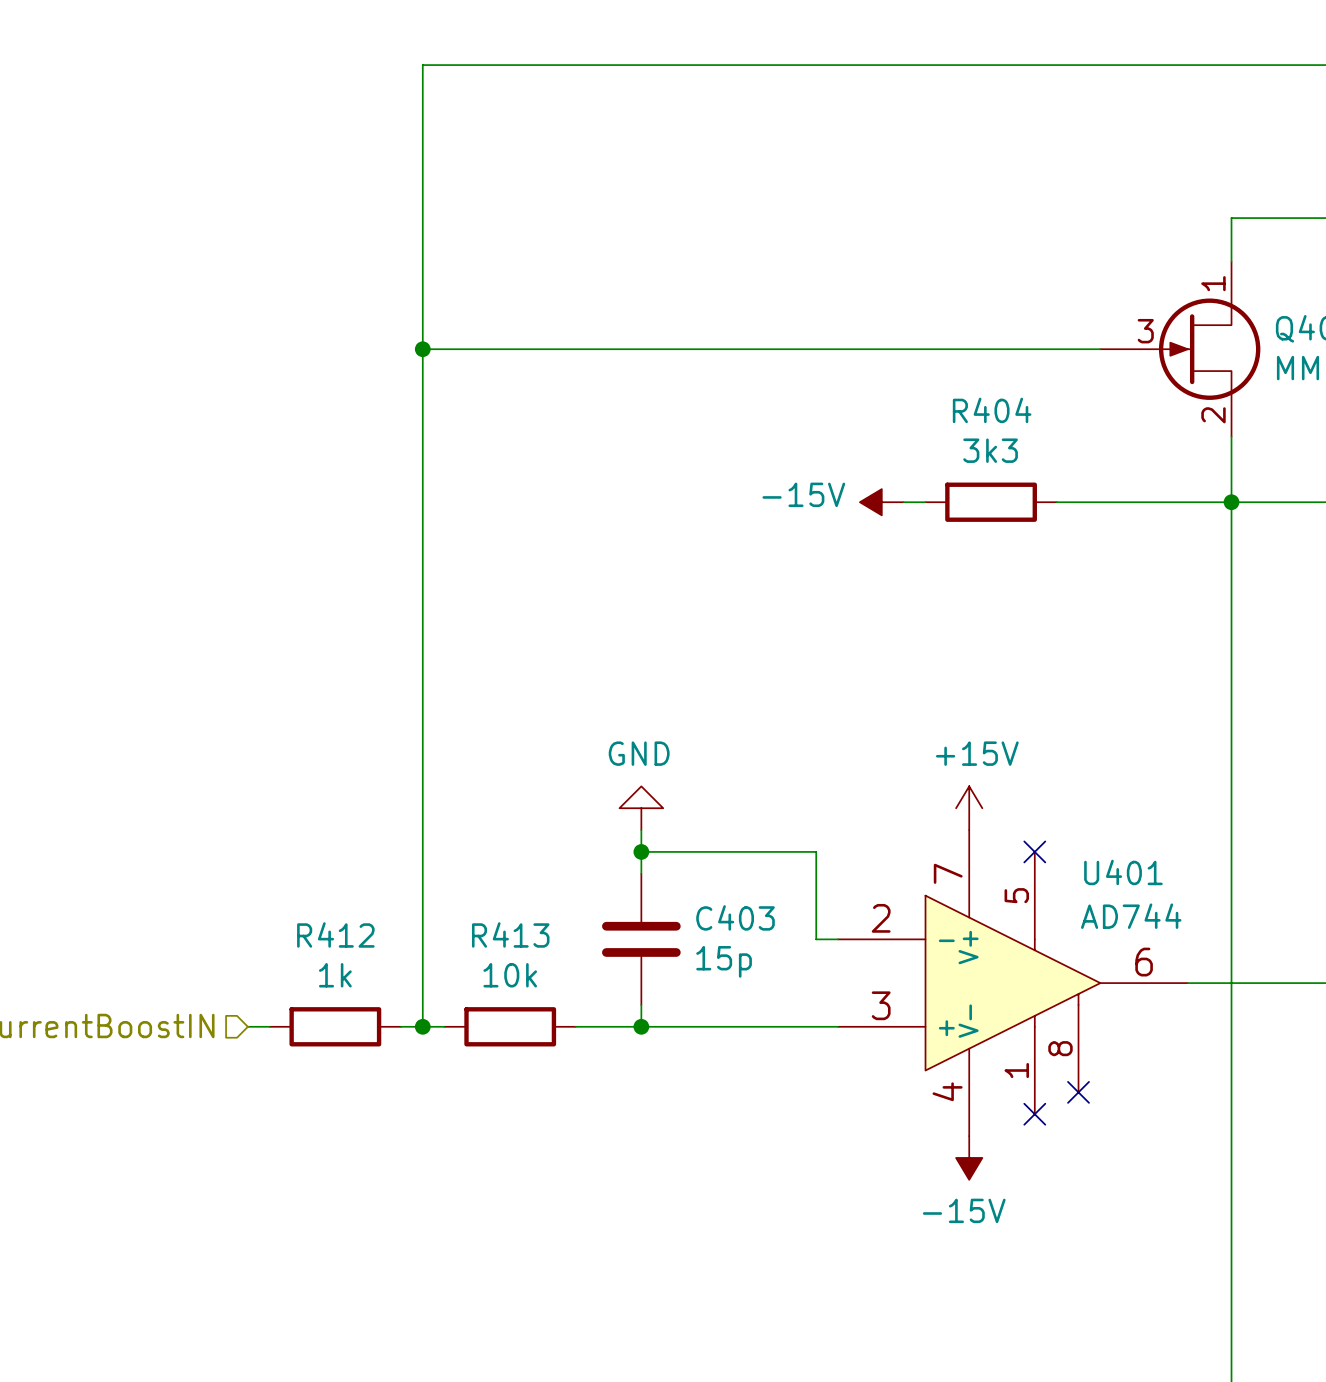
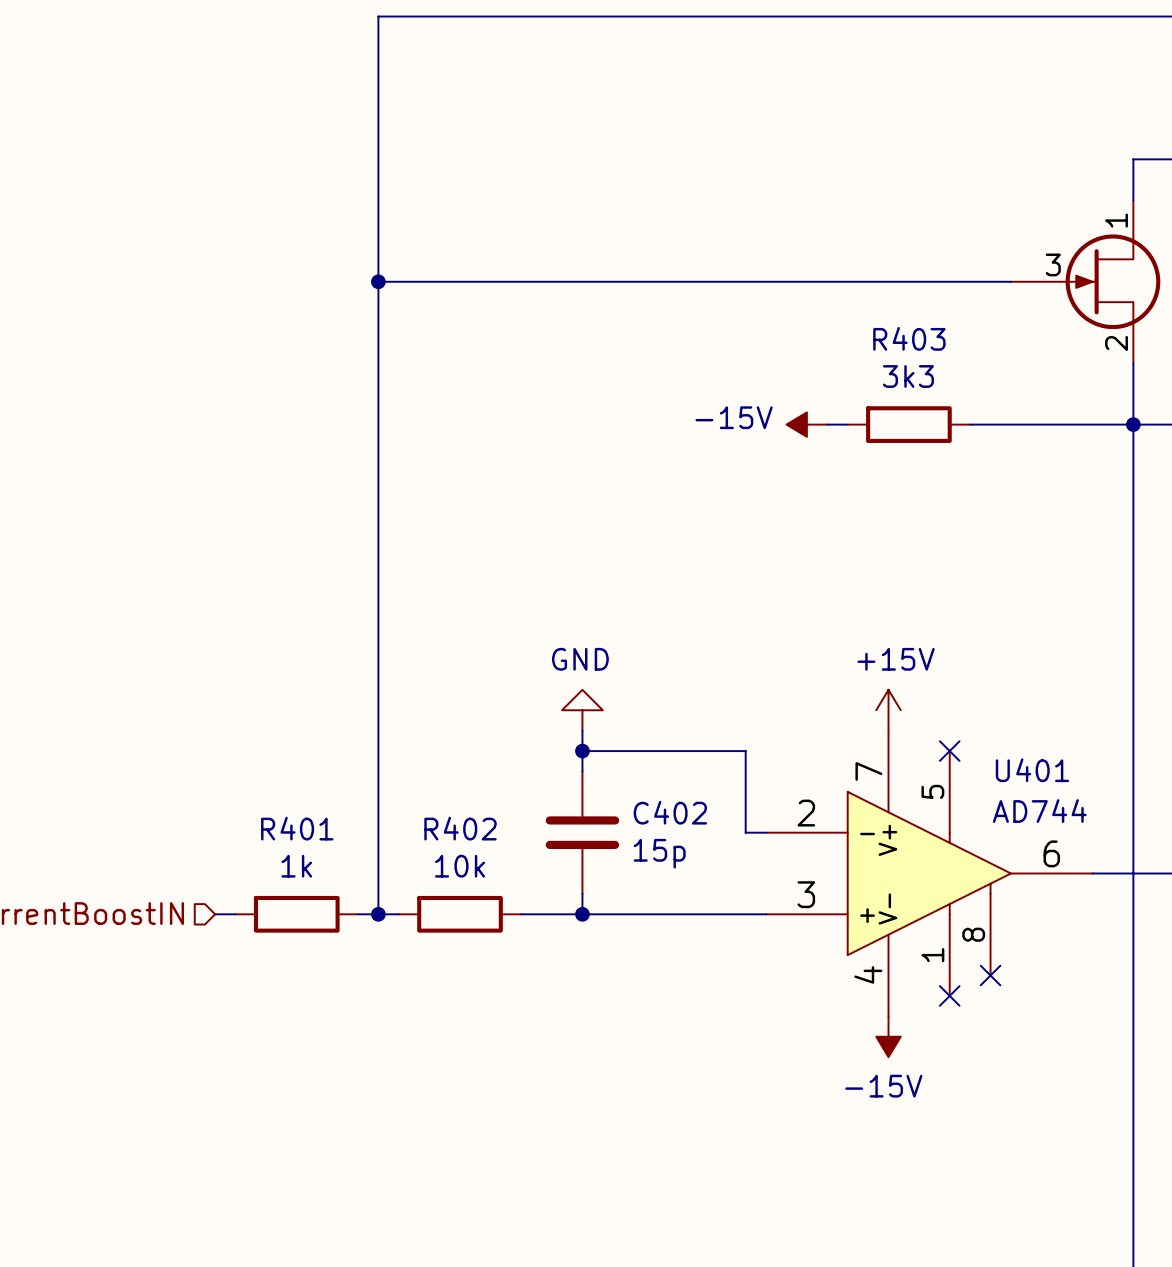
R404 name: R404 (992, 410) -> R403 (909, 338)
C403 name: C403 (735, 917) -> C402 (670, 812)
R412 name: R412 (335, 934) -> R401 (297, 828)
R413 name: R413 (510, 934) -> R402 (460, 828)

